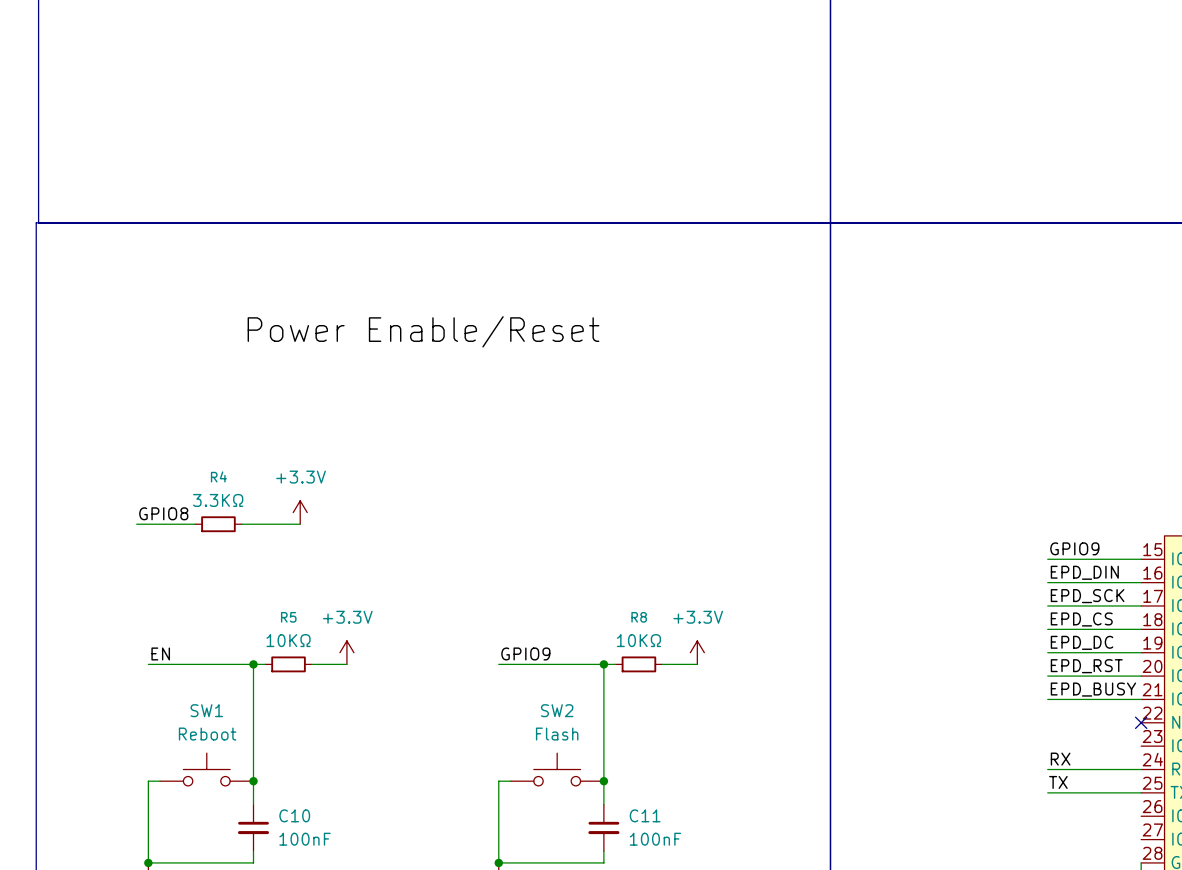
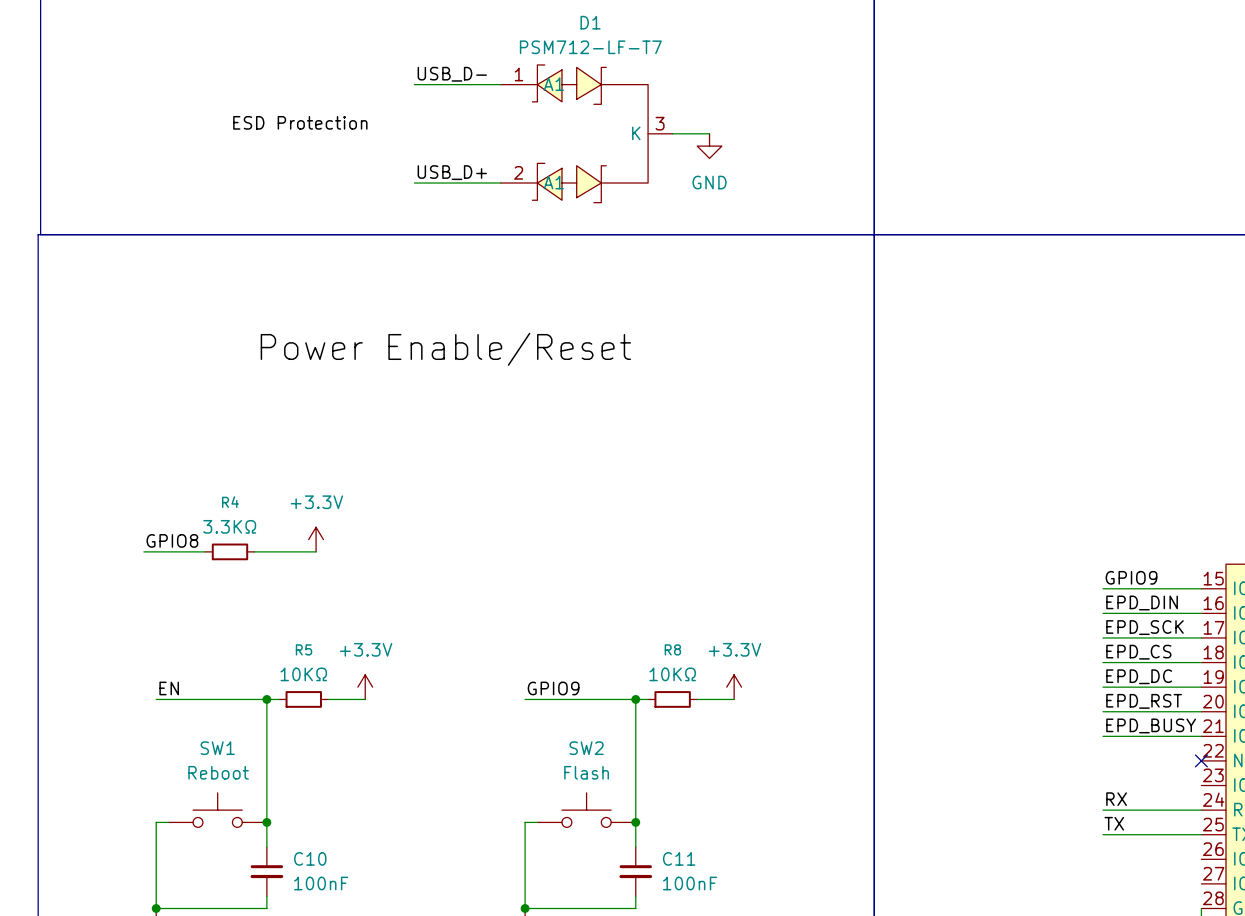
label: none -> USB_D- (452, 74)
wire: none -> (414, 84) (500, 84)
label: none -> ESD Protection (300, 122)
D1: none -> PSM712-LF-T7 (586, 133)
wire: none -> (672, 133) (709, 133)
power symbol: none -> GND (709, 146)
label: none -> USB_D+ (452, 172)
wire: none -> (414, 183) (500, 183)

